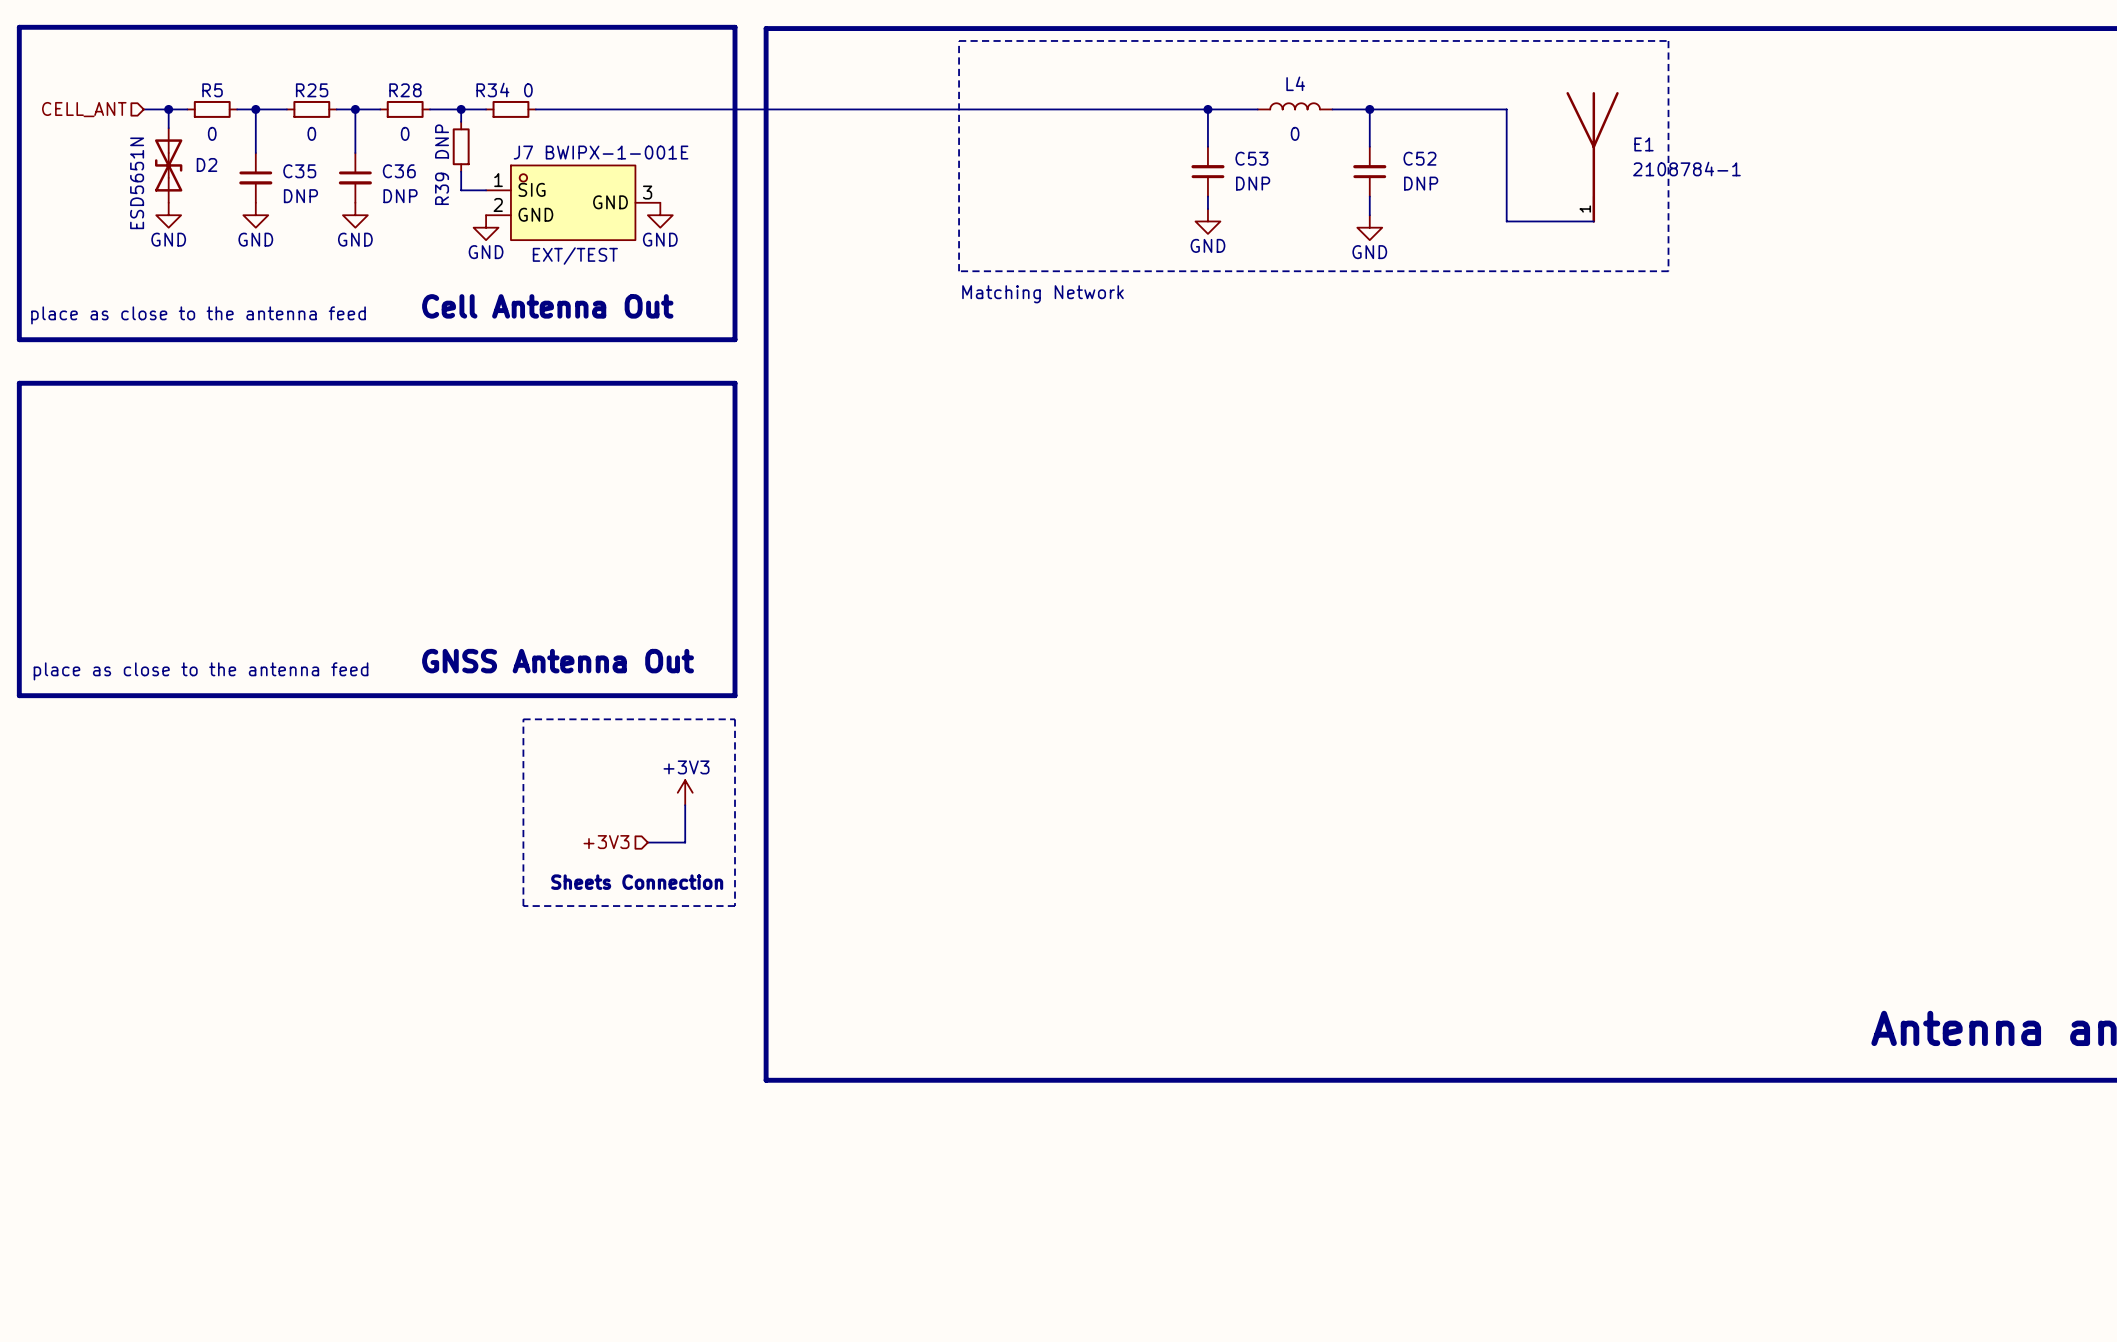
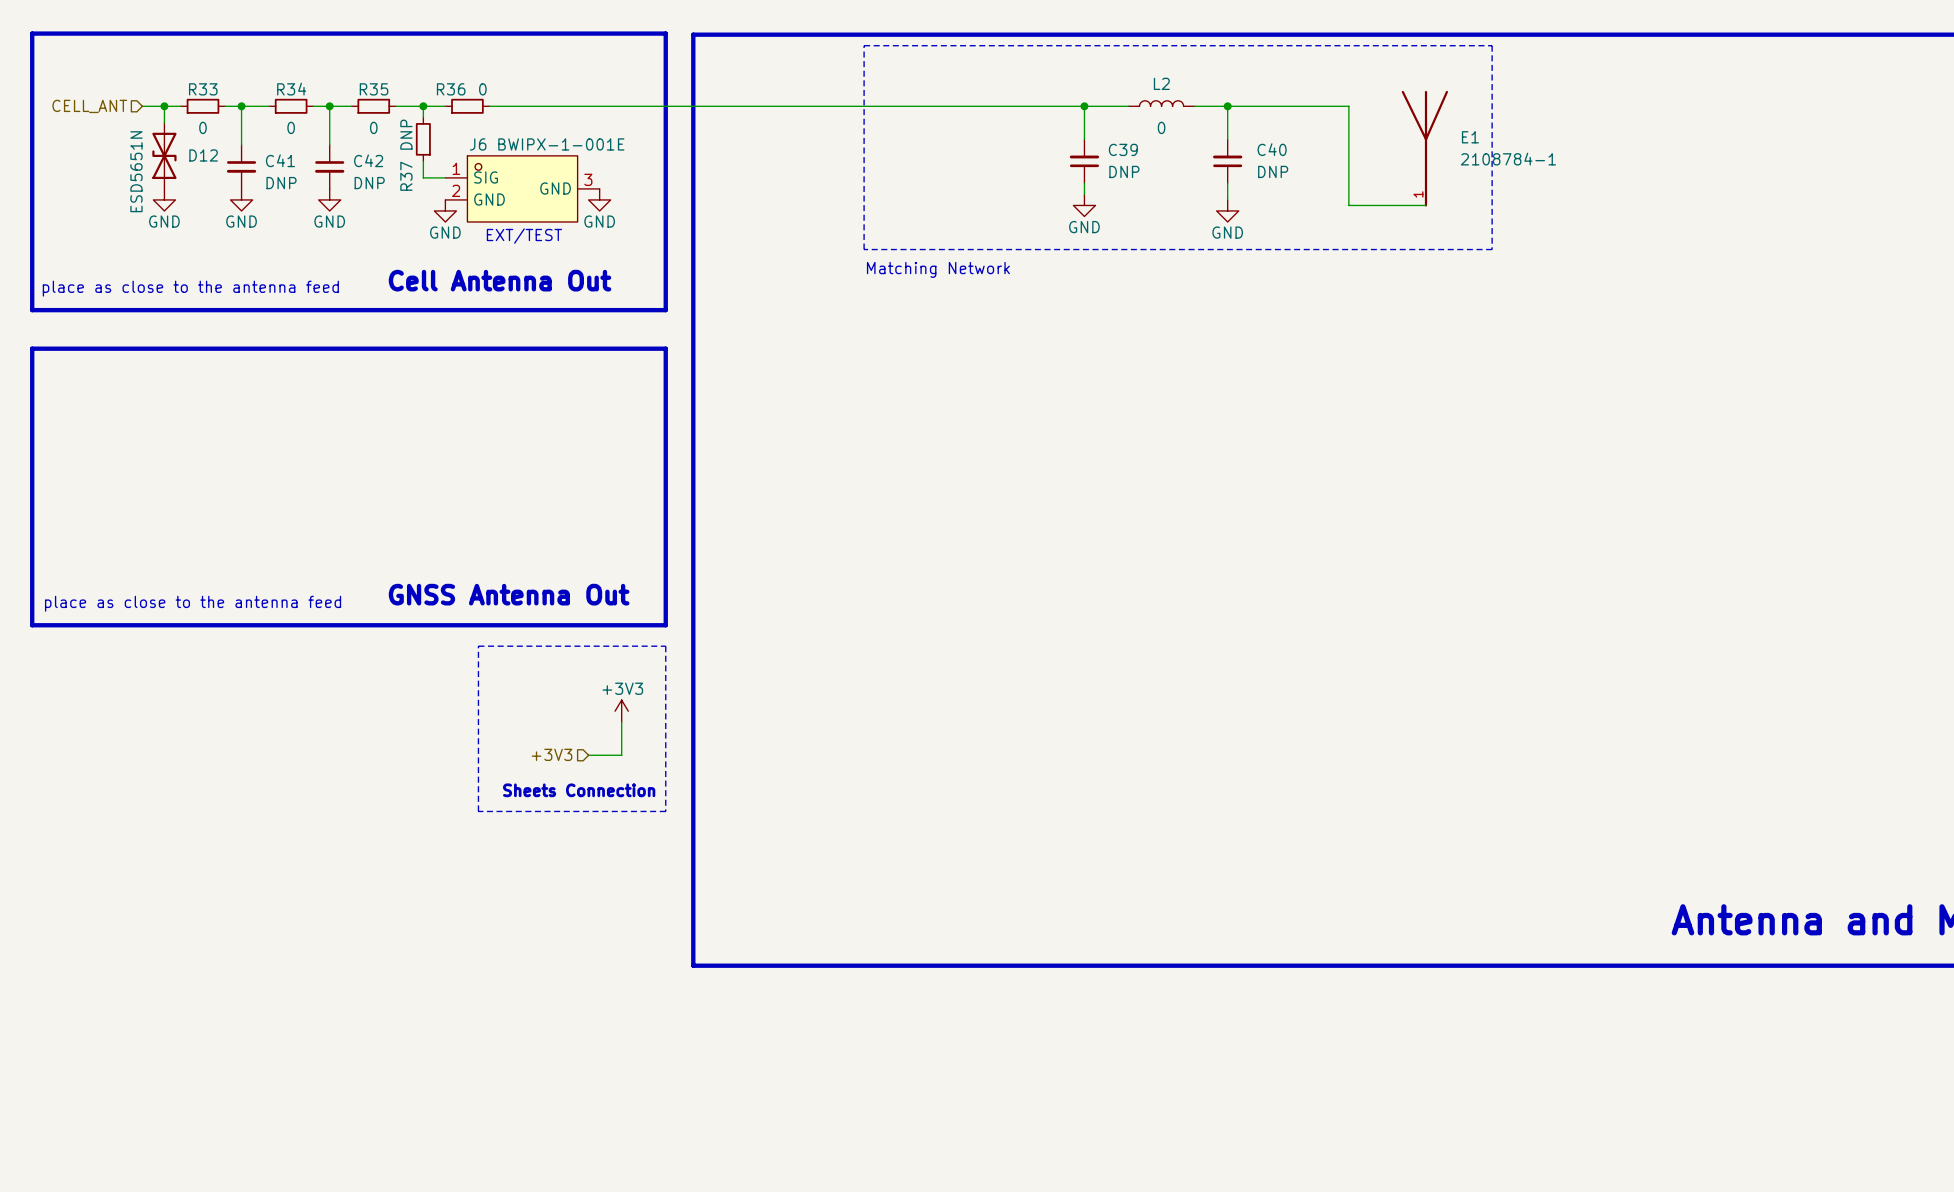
L4 name: L4 (1295, 83) -> L2 (1161, 83)
R5 name: R5 (212, 90) -> R33 (203, 89)
R25 name: R25 (312, 90) -> R34 (291, 89)
R28 name: R28 (405, 90) -> R35 (374, 89)
R34 name: R34 (492, 90) -> R36 (451, 89)
J7 name: J7 (523, 152) -> J6 (478, 144)
C53 name: C53 (1251, 158) -> C39 (1123, 149)
C52 name: C52 (1419, 158) -> C40 (1272, 149)
D2 name: D2 (207, 164) -> D12 (203, 155)
C35 name: C35 (299, 171) -> C41 (280, 160)
C36 name: C36 (399, 171) -> C42 (368, 160)
R39 name: R39 (442, 188) -> R37 (406, 176)

